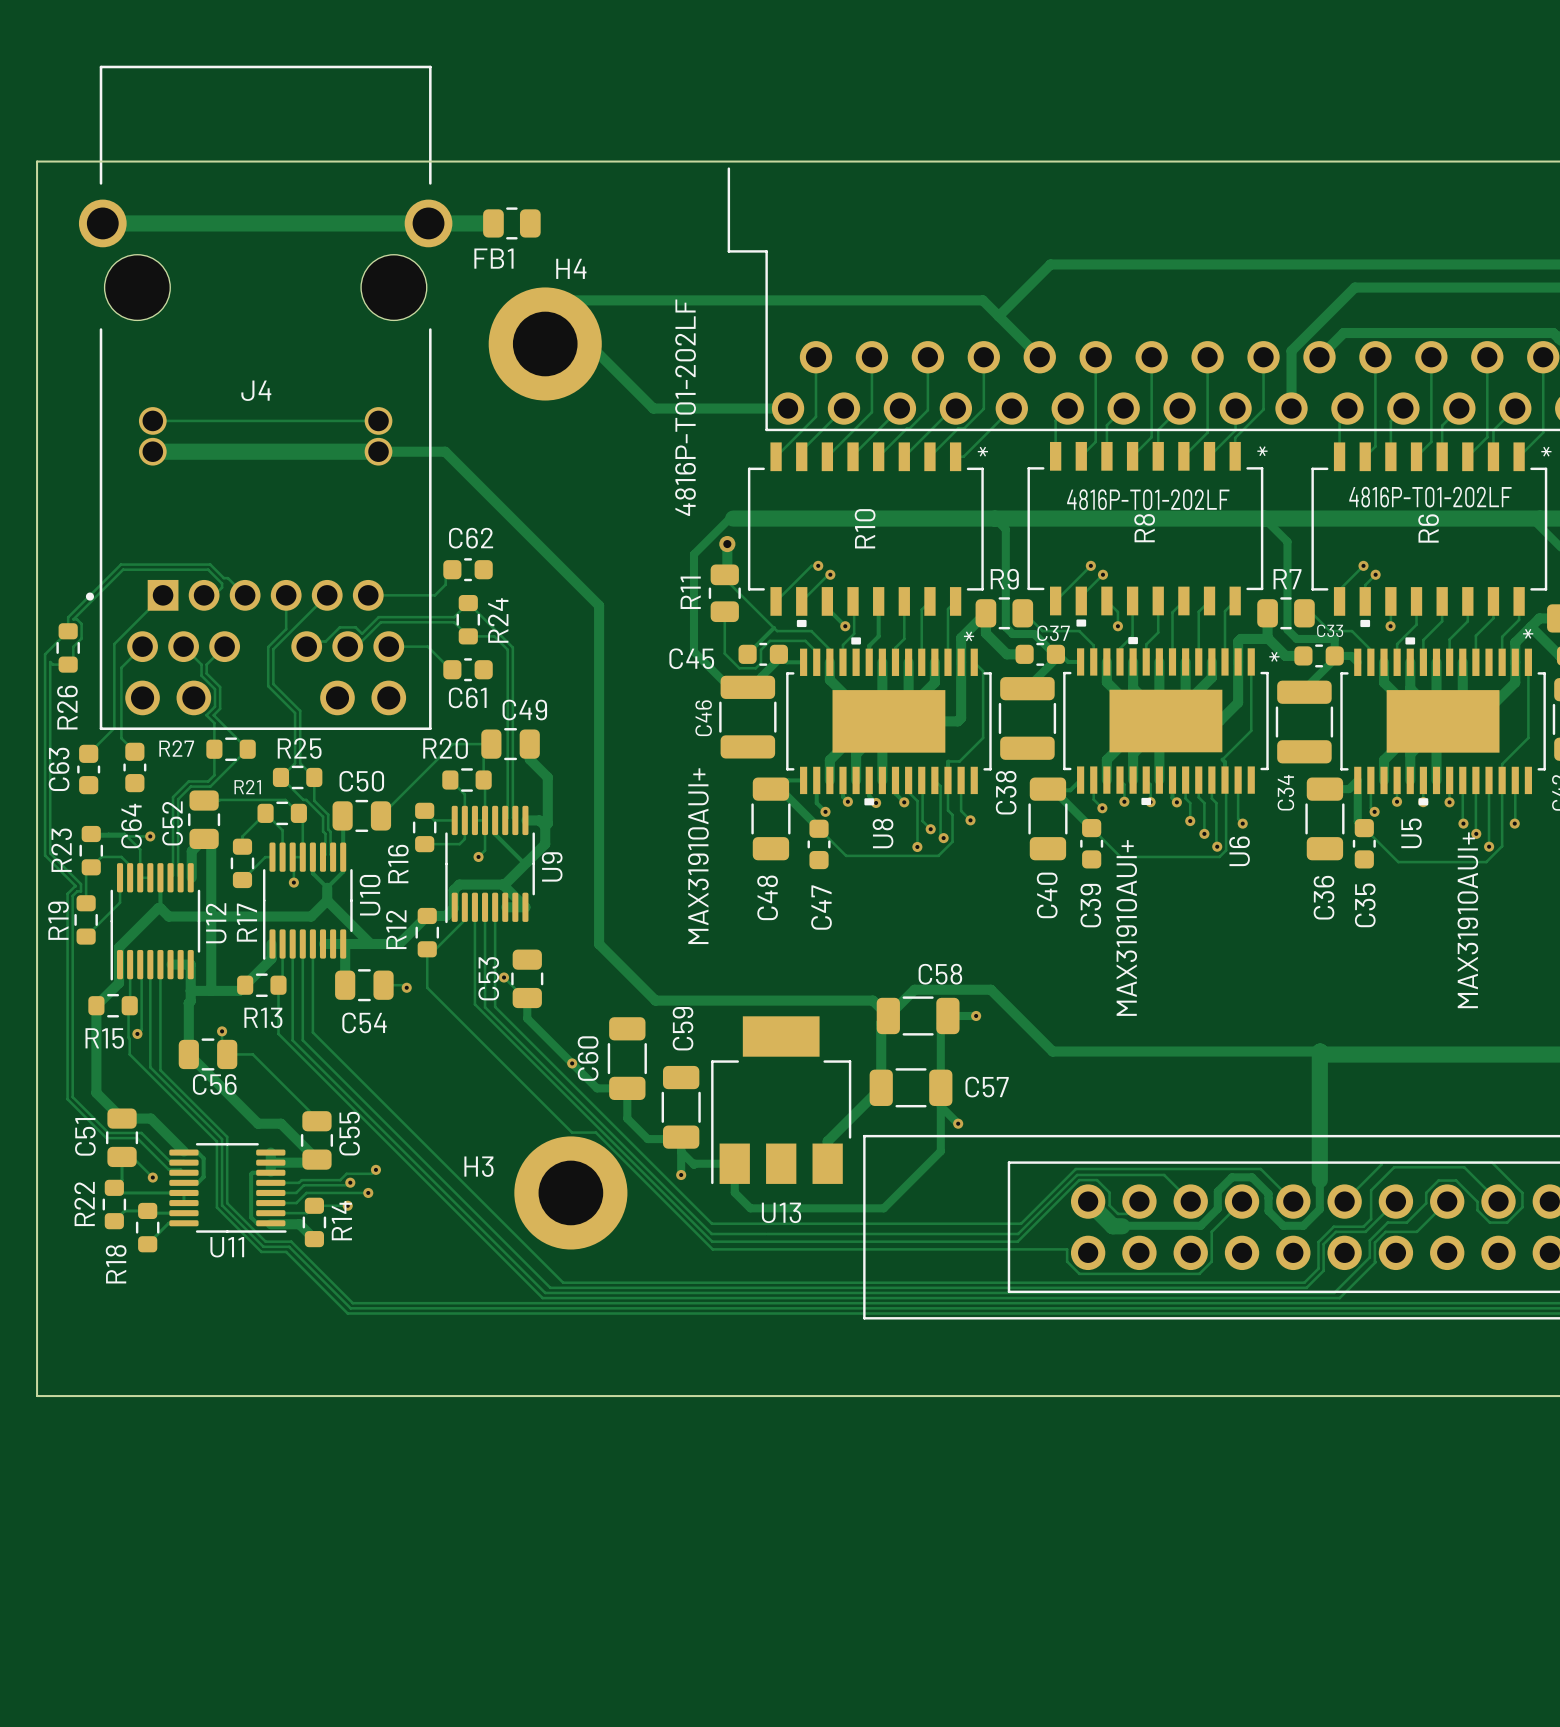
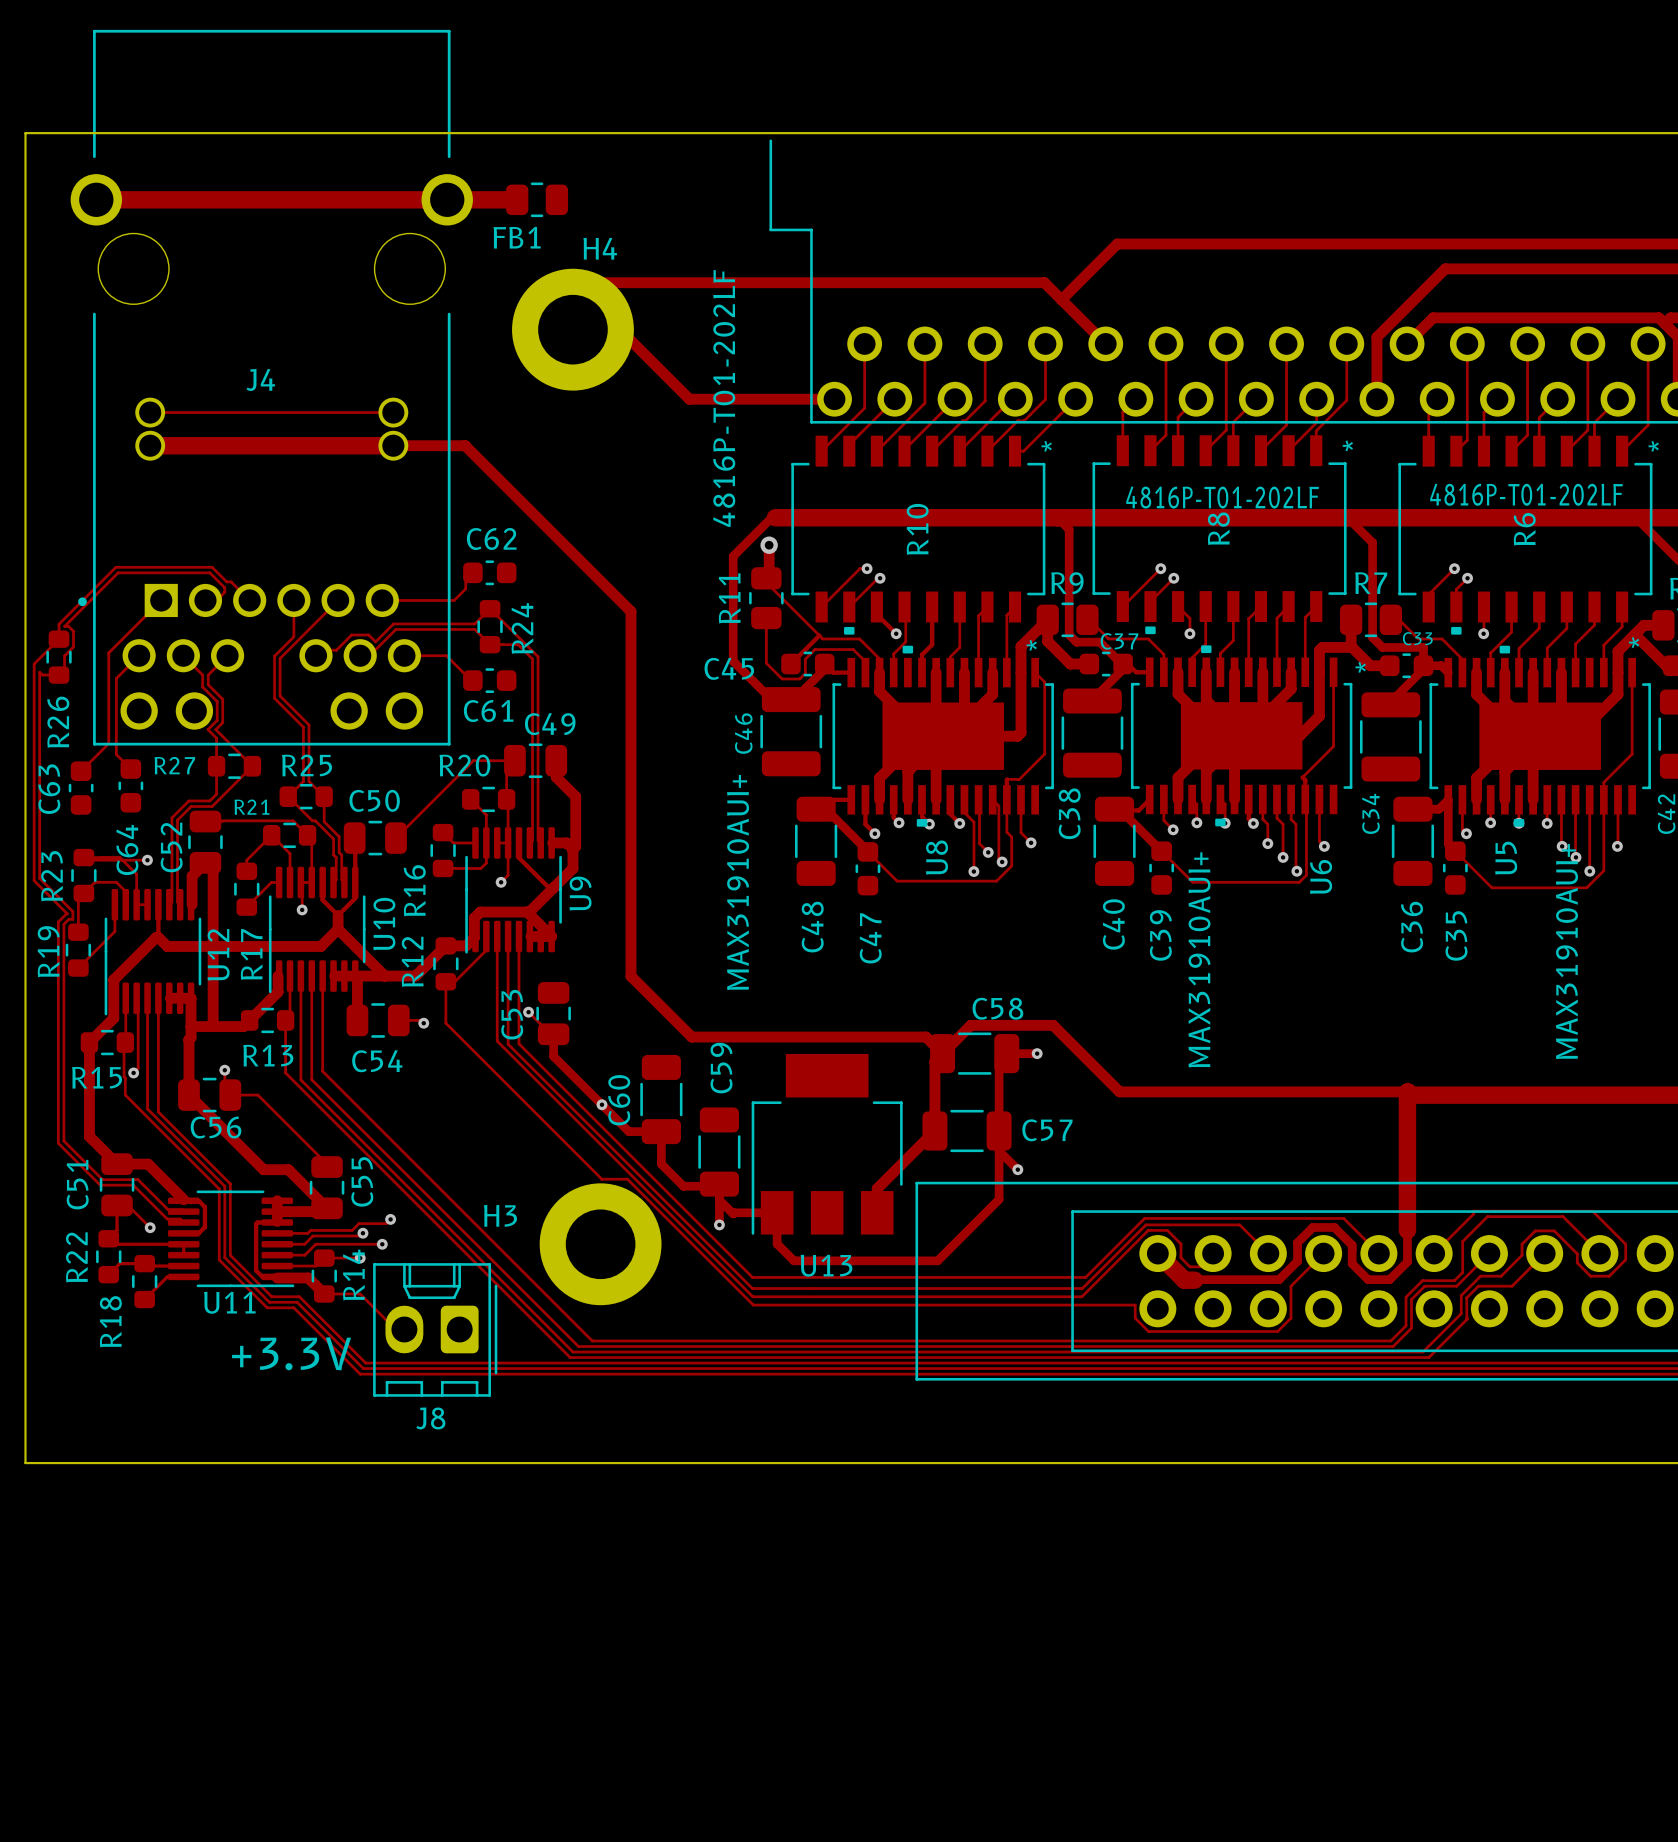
track: none -> (324, 1293) (360, 1293) (395, 1329) (404, 1329)
J8: none -> (435, 1329)
text: none -> +3.3V (291, 1353)

